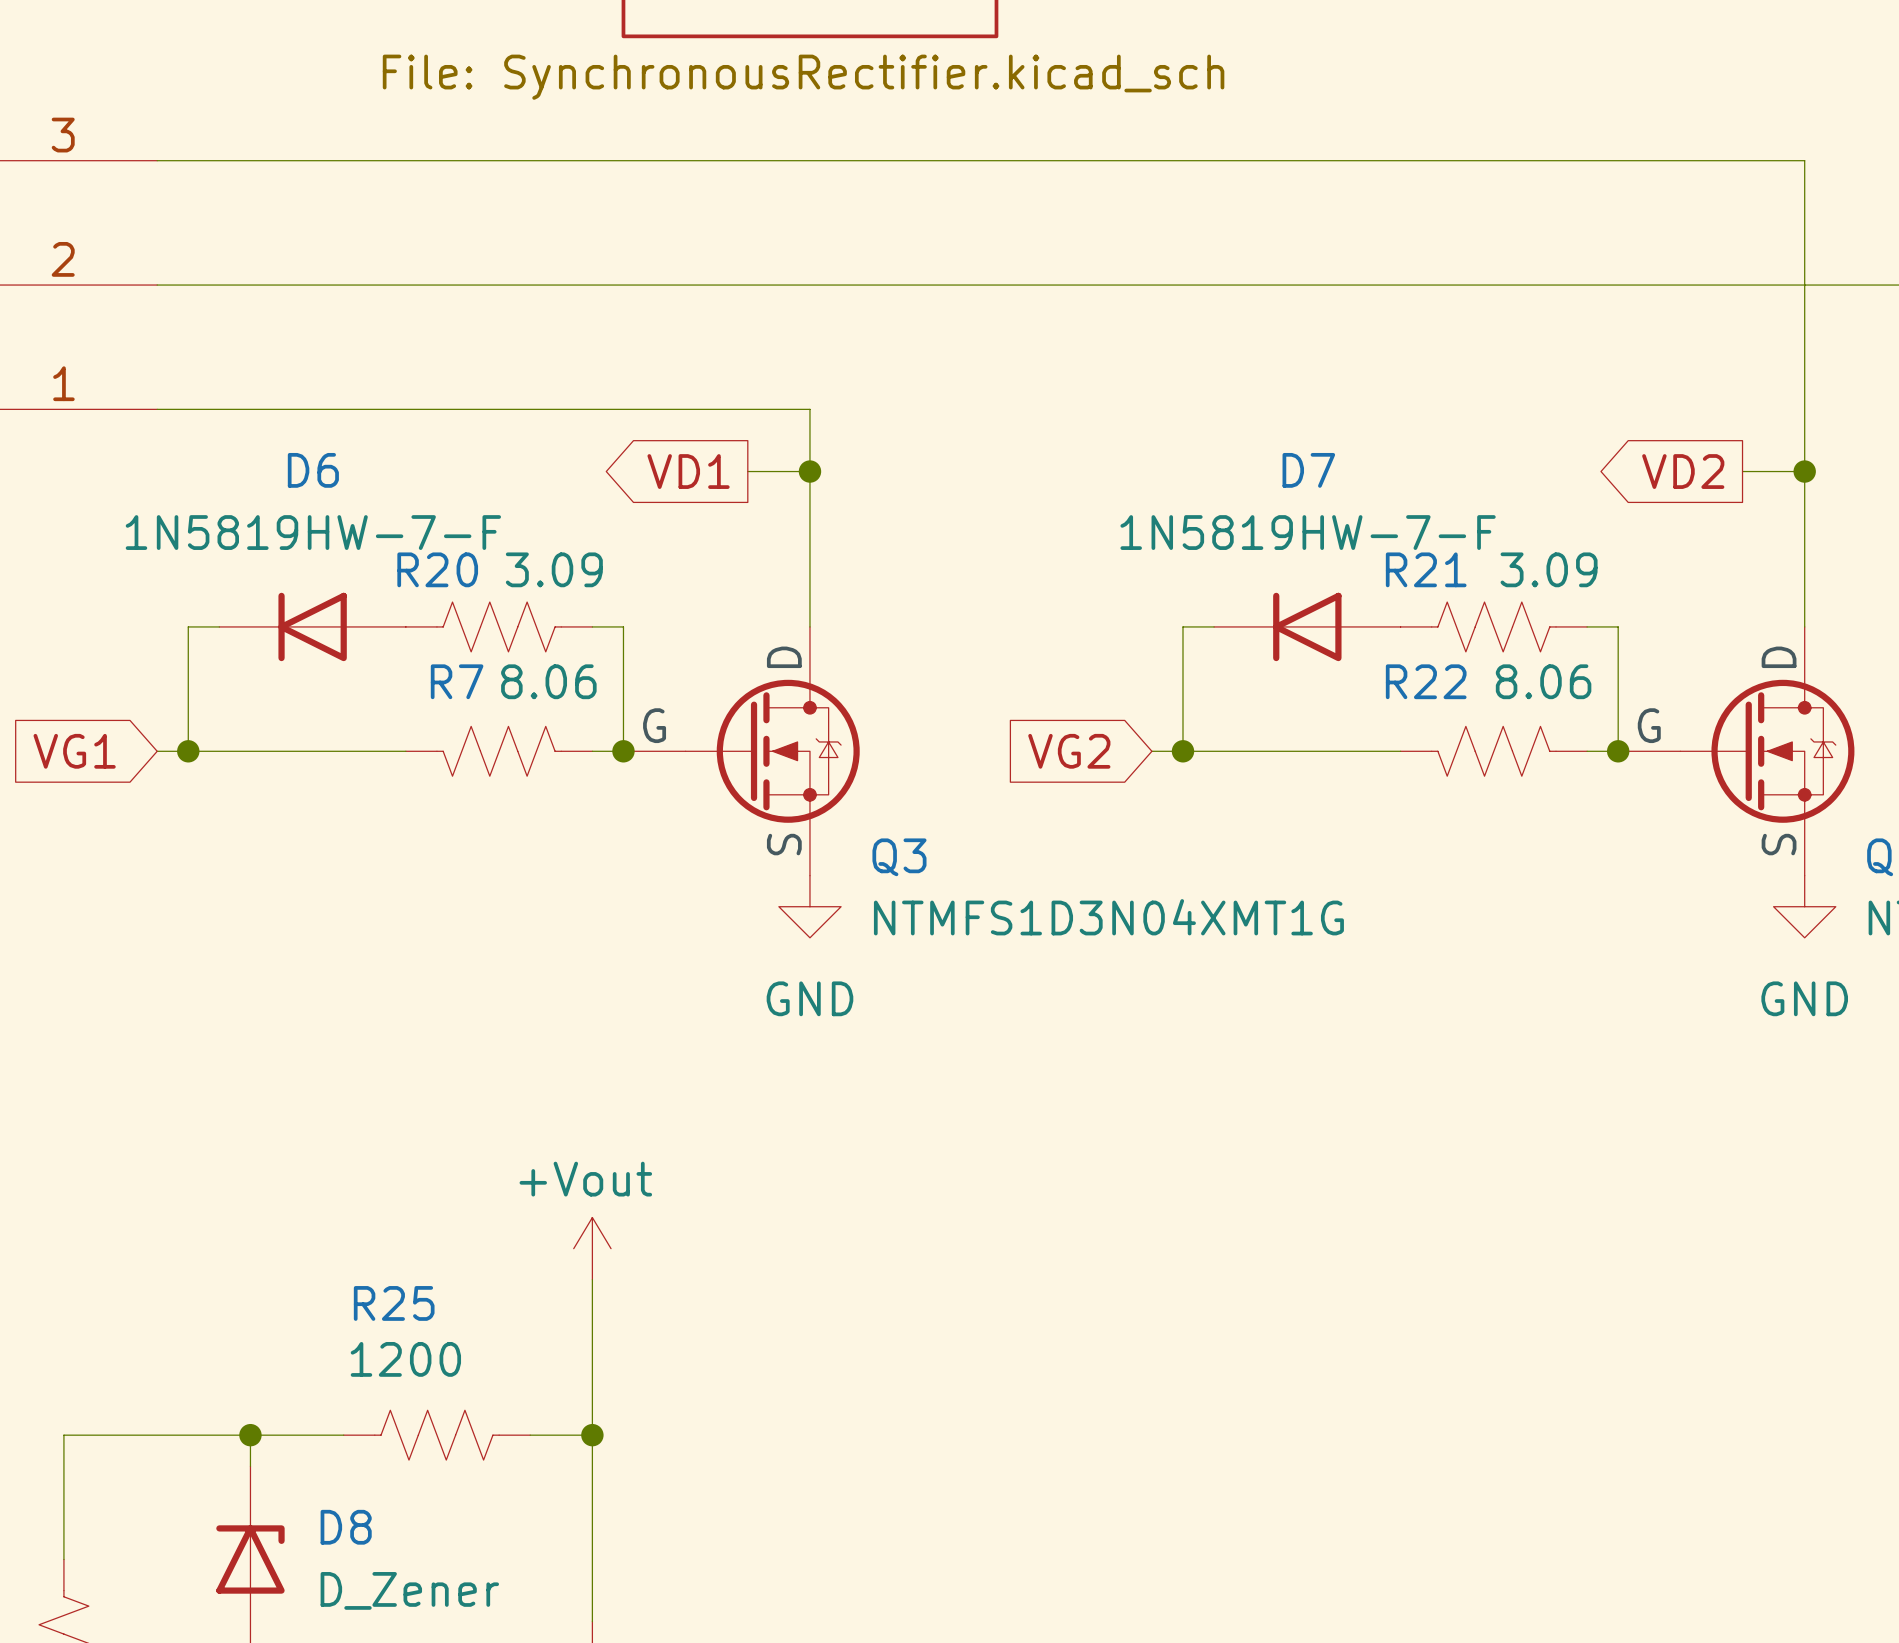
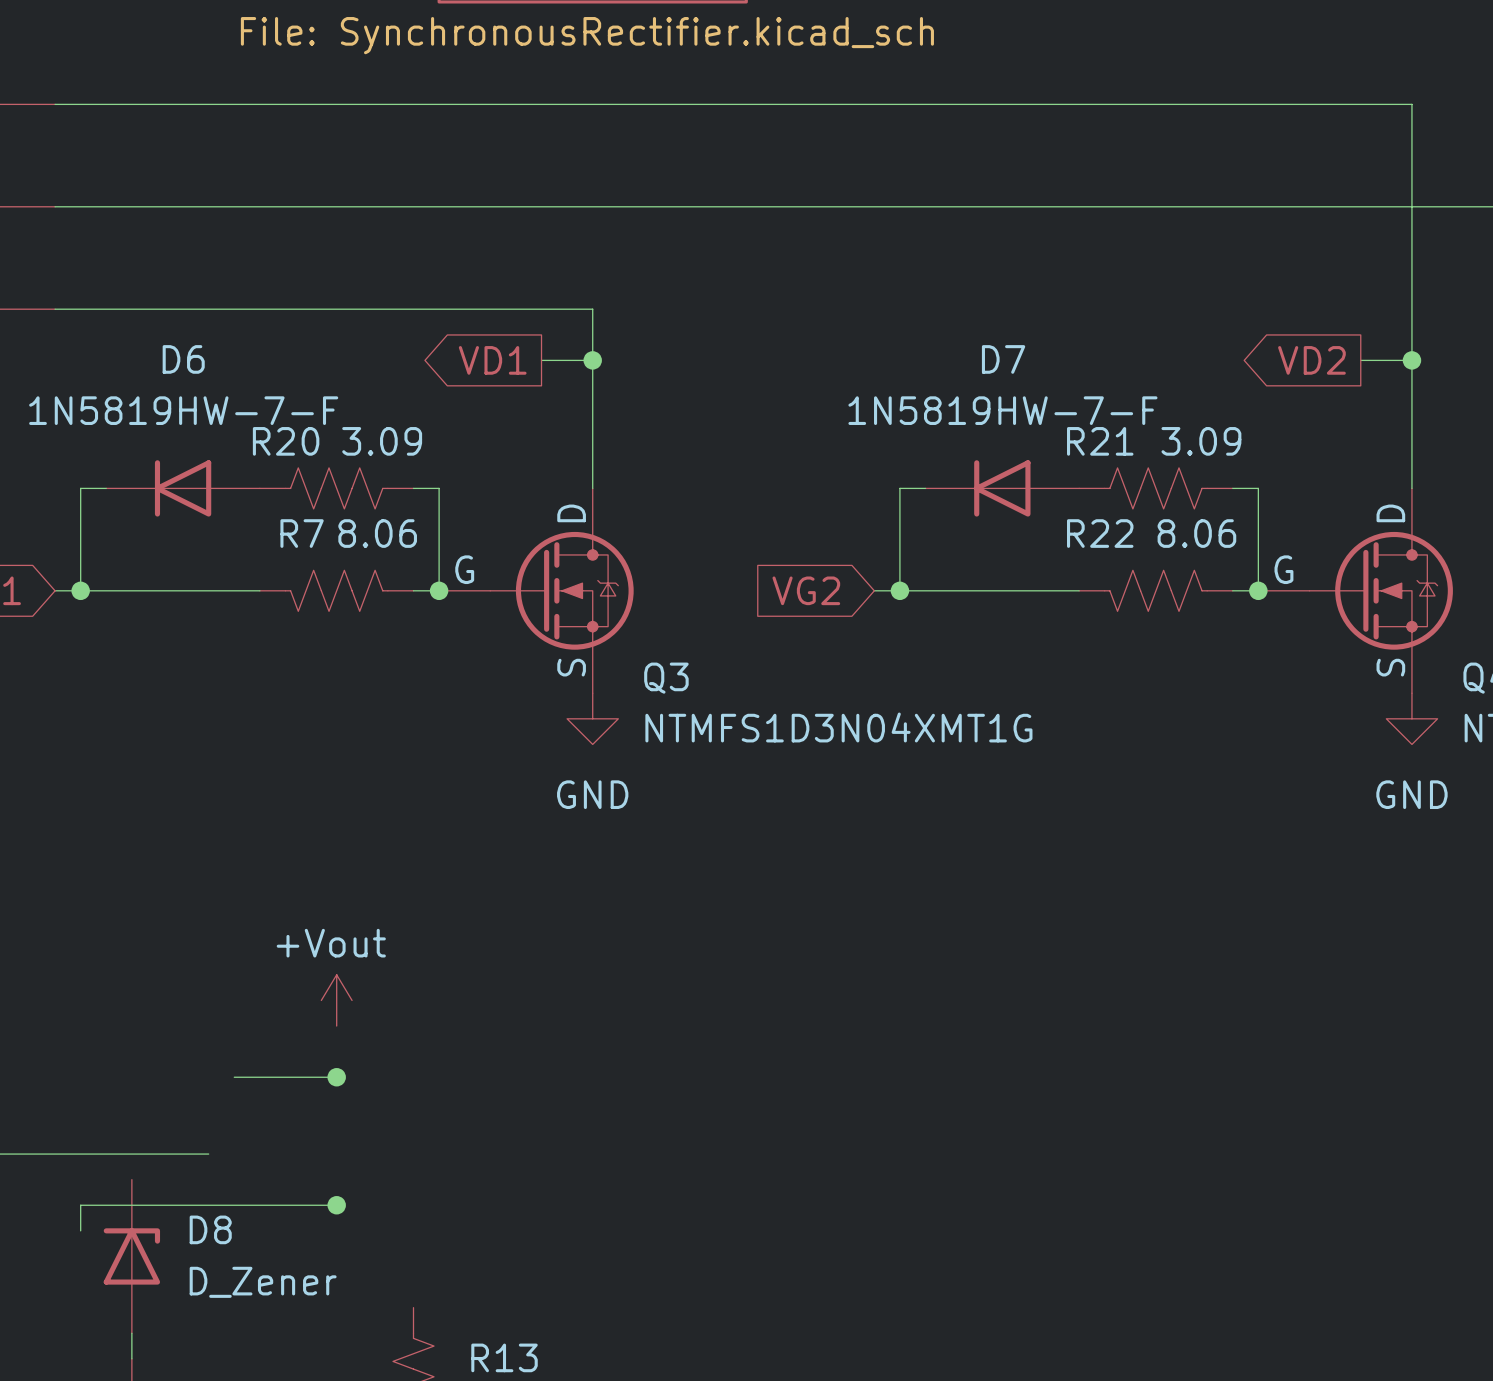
power symbol position: +Vout (592, 1248) -> +Vout (336, 1000)
wire: (592, 1279) (592, 1621) -> none
wire: none -> (234, 1077) (336, 1077)
junction: none -> (336, 1077)
wire: (250, 1435) (250, 1466) -> none
junction: (250, 1435) -> none
R25: 1200 (436, 1435) -> none
wire: (530, 1435) (592, 1435) -> none
junction: (592, 1435) -> none
wire: none -> (336, 1205) (80, 1205) (80, 1230)
junction: none -> (336, 1205)

